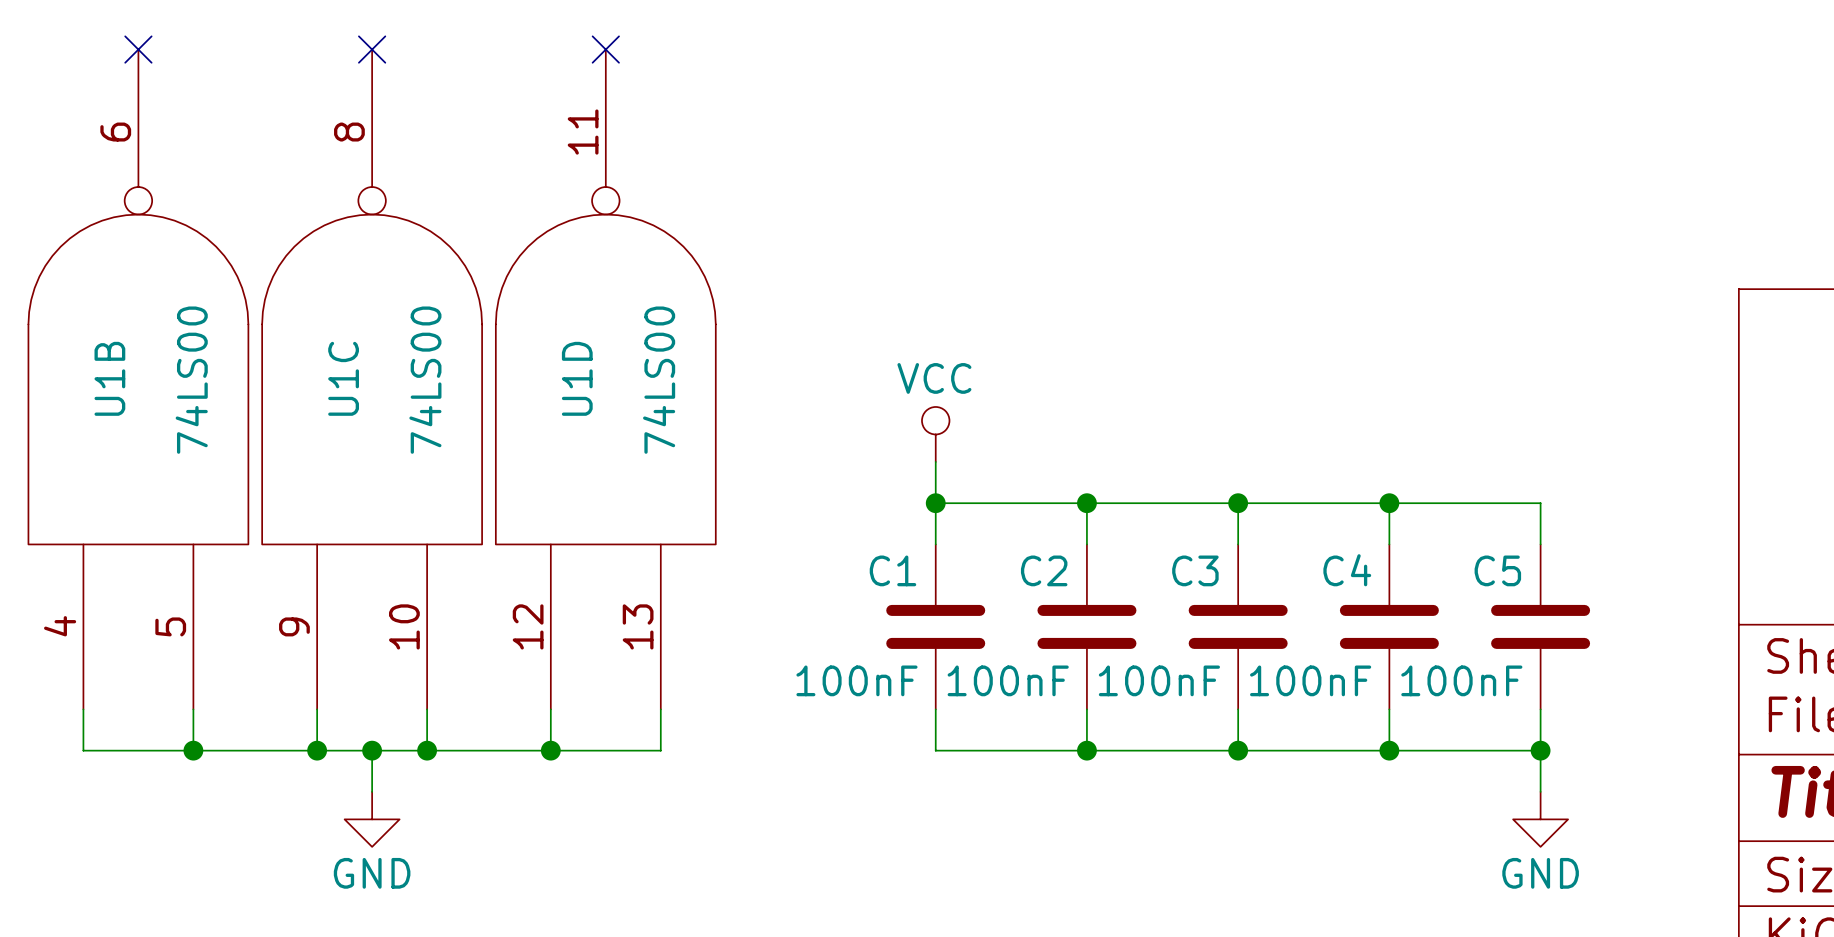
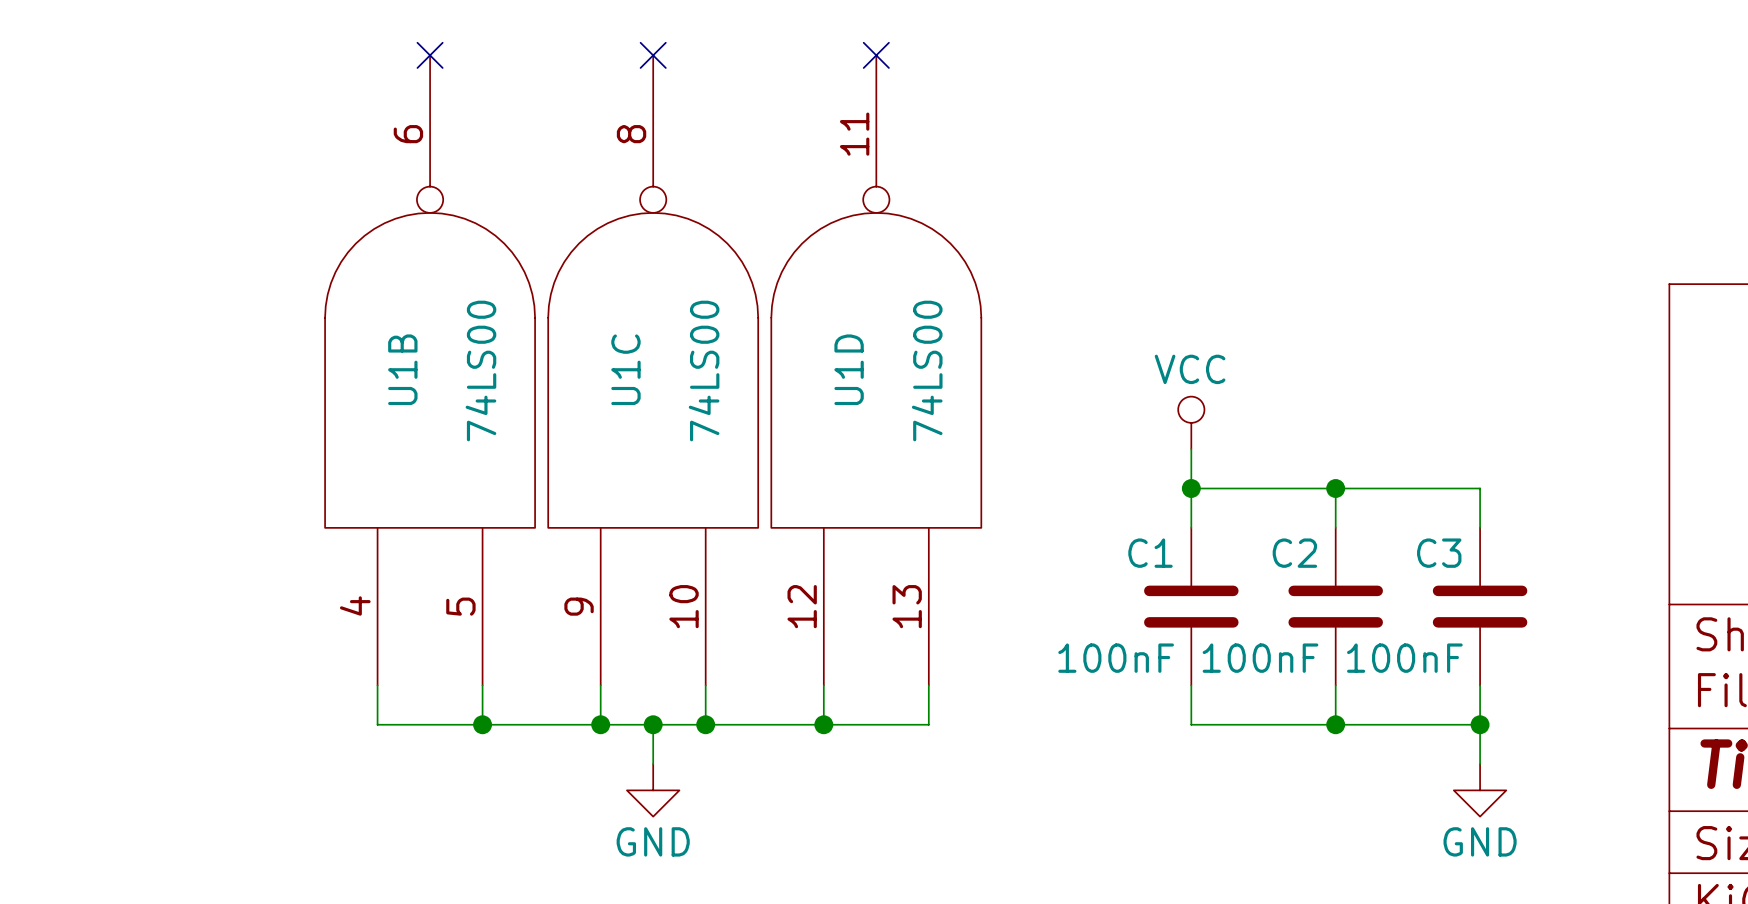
no-connect mark: (138, 49) -> none
no-connect mark position: (372, 49) -> (430, 55)
no-connect mark position: (605, 49) -> (653, 55)
no-connect mark: none -> (876, 55)
U1B position: (138, 379) -> (430, 370)
U1C position: (372, 379) -> (653, 370)
U1D position: (605, 379) -> (876, 370)
power symbol position: VCC (935, 434) -> VCC (1191, 422)
wire: (935, 461) (935, 544) -> none
wire: (935, 503) (1238, 503) -> (1191, 449) (1191, 488)
junction: (935, 503) -> none
wire: (1086, 503) (1086, 544) -> none
junction: (1086, 503) -> none
C3 name: C3 (1195, 570) -> C1 (1150, 553)
C4 name: C4 (1347, 570) -> C2 (1294, 553)
C5 name: C5 (1497, 570) -> C3 (1439, 553)
C1: 100nF (935, 626) -> none
C2: 100nF (1086, 626) -> none
wire: (83, 709) (83, 750) (385, 750) -> (377, 685) (377, 724)
wire: (193, 709) (193, 750) -> (482, 685) (482, 724)
wire: (317, 709) (317, 750) -> (600, 685) (600, 724)
wire: (427, 709) (427, 750) -> (705, 685) (705, 724)
wire: (550, 709) (550, 750) -> (823, 685) (823, 724)
wire: (660, 709) (660, 750) -> (902, 724) (640, 724)
wire: (935, 709) (935, 750) -> none
wire: (1086, 709) (1086, 750) -> none
junction: (193, 750) -> none
junction: (317, 750) -> none
wire: (372, 750) (372, 791) -> (653, 724) (653, 764)
junction: (372, 750) -> none
junction: (427, 750) -> none
junction: none -> (482, 724)
junction: (550, 750) -> none
junction: none -> (600, 724)
junction: none -> (653, 724)
junction: none -> (705, 724)
junction: none -> (823, 724)
wire: (963, 750) (1238, 750) -> (928, 724) (928, 685)
junction: (1086, 750) -> none
junction: (1238, 750) -> none
power symbol position: GND (372, 819) -> GND (653, 790)

